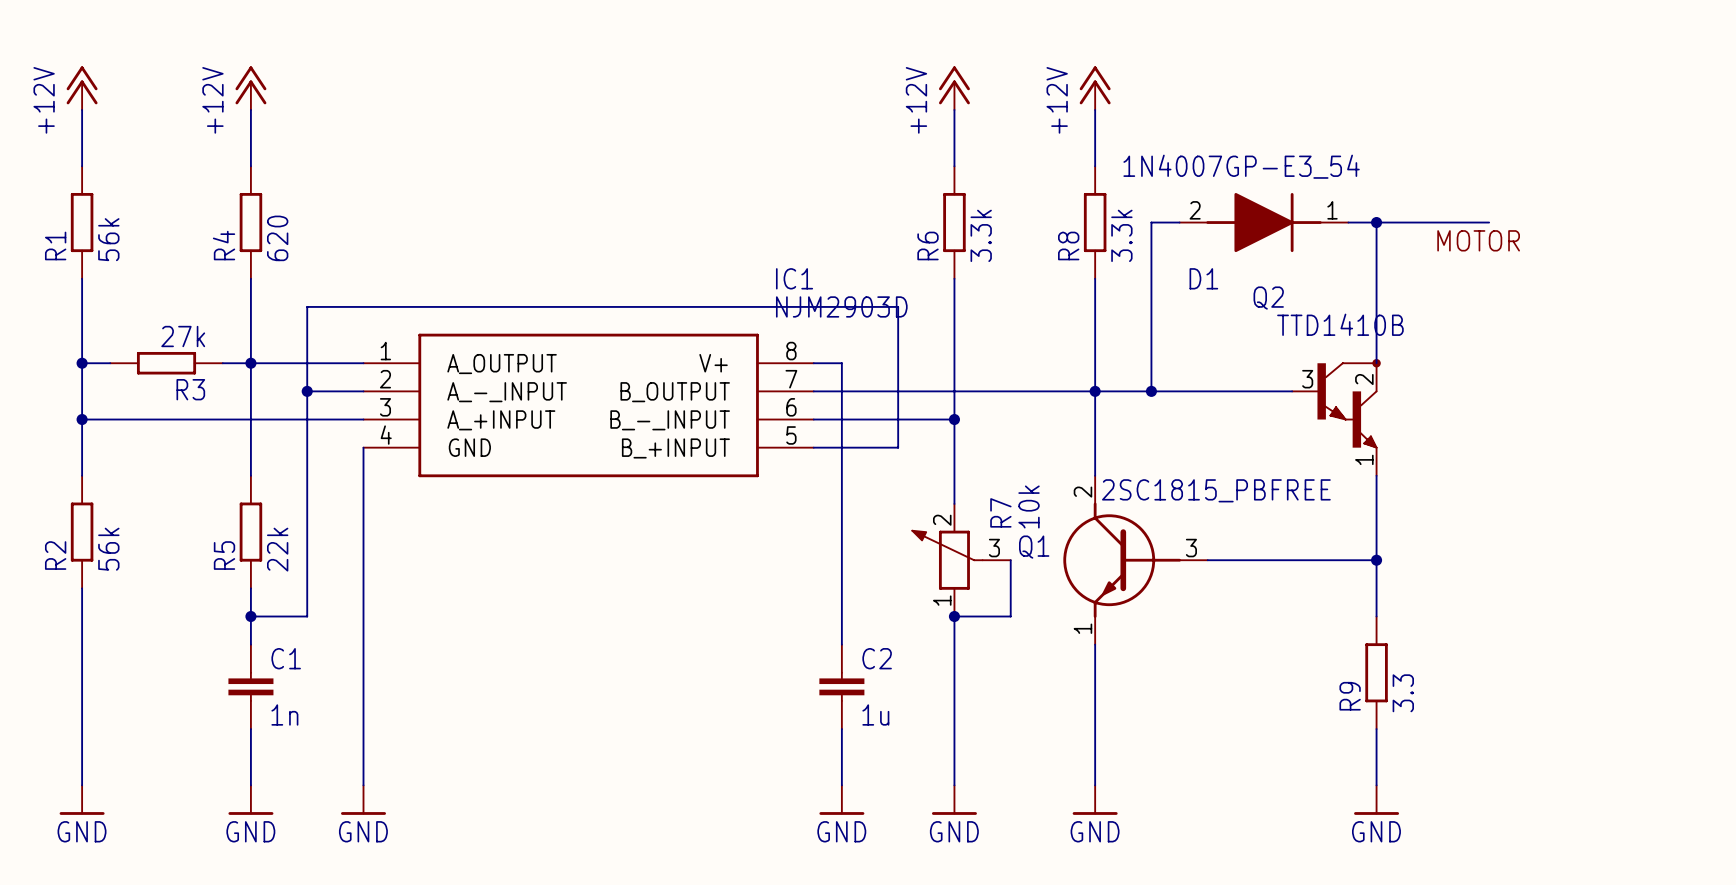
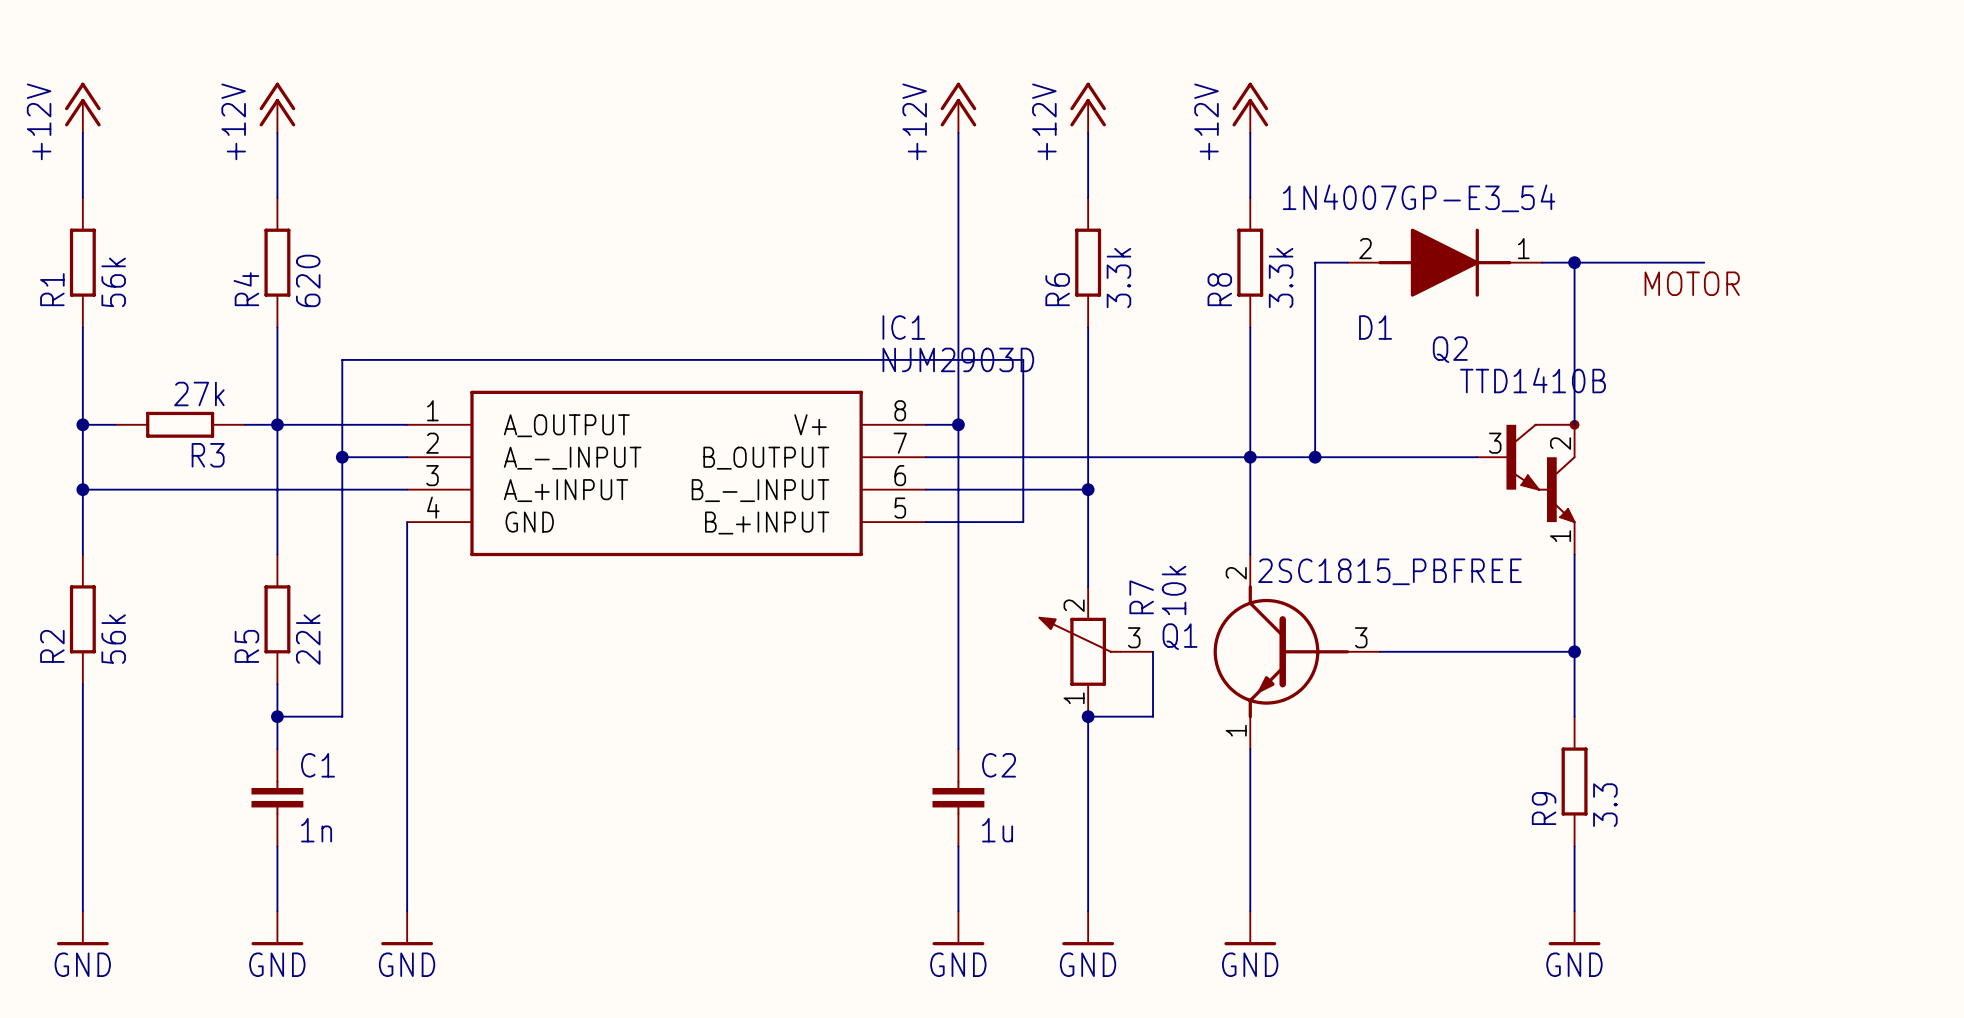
power symbol: none -> +12V (958, 107)
wire: none -> (958, 132) (958, 424)
junction: none -> (958, 424)

